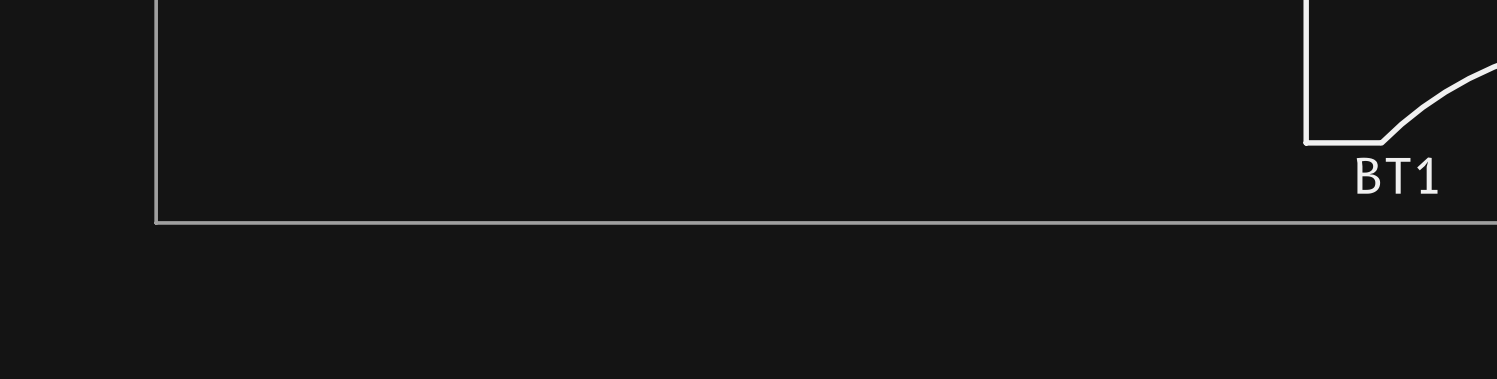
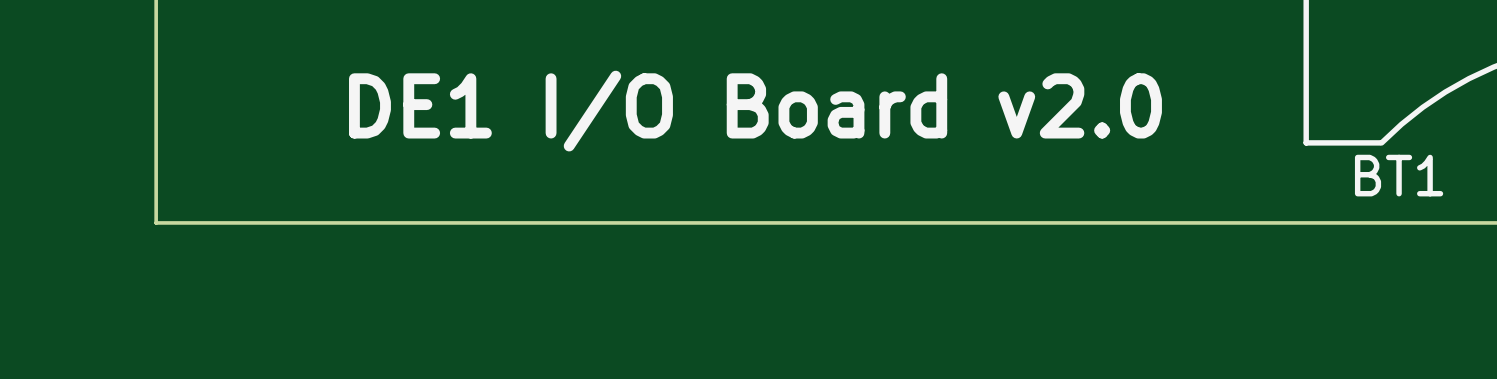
text: none -> DE1 I/O Board v2.0 (755, 111)

